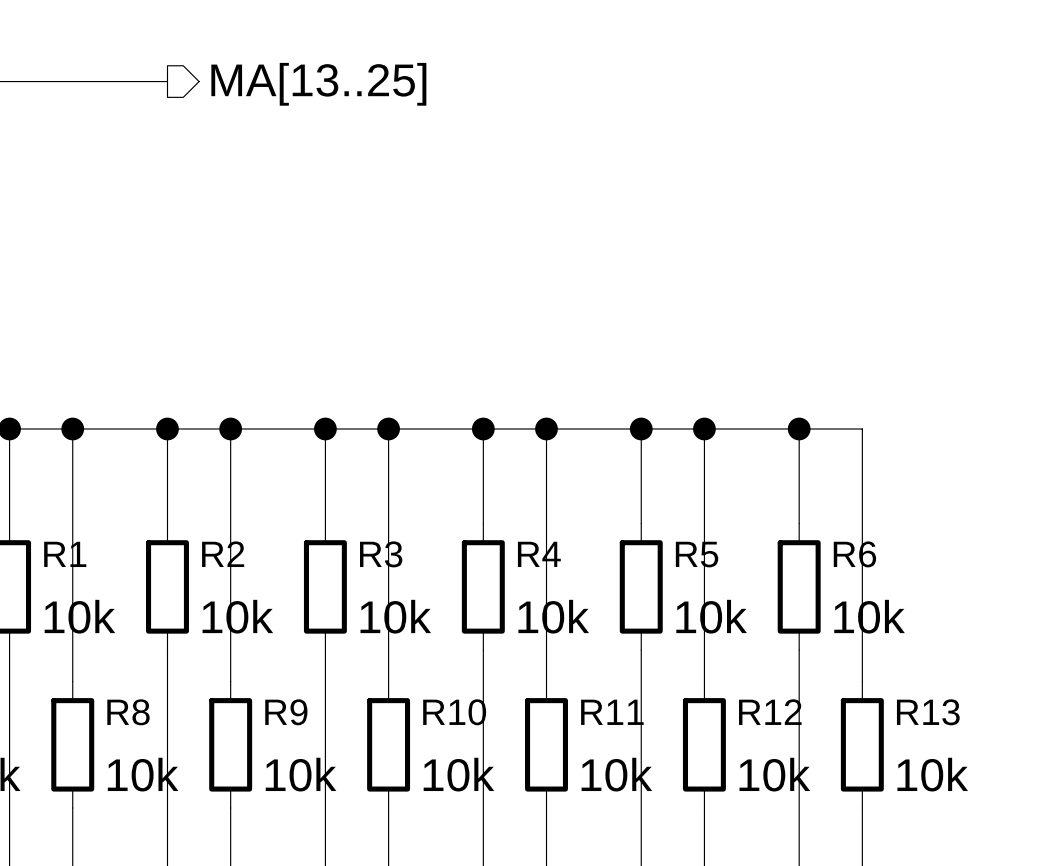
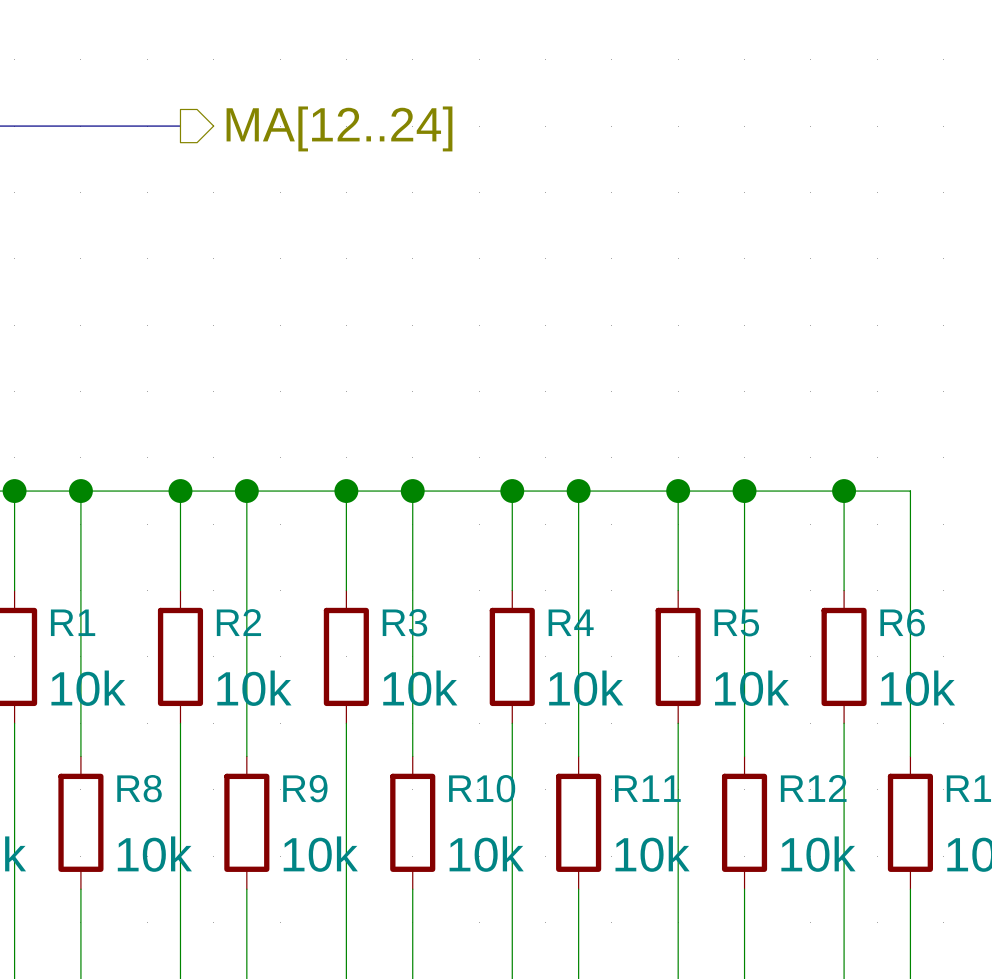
hierarchical label: MA[13..25] (318, 84) -> MA[12..24] (339, 128)

